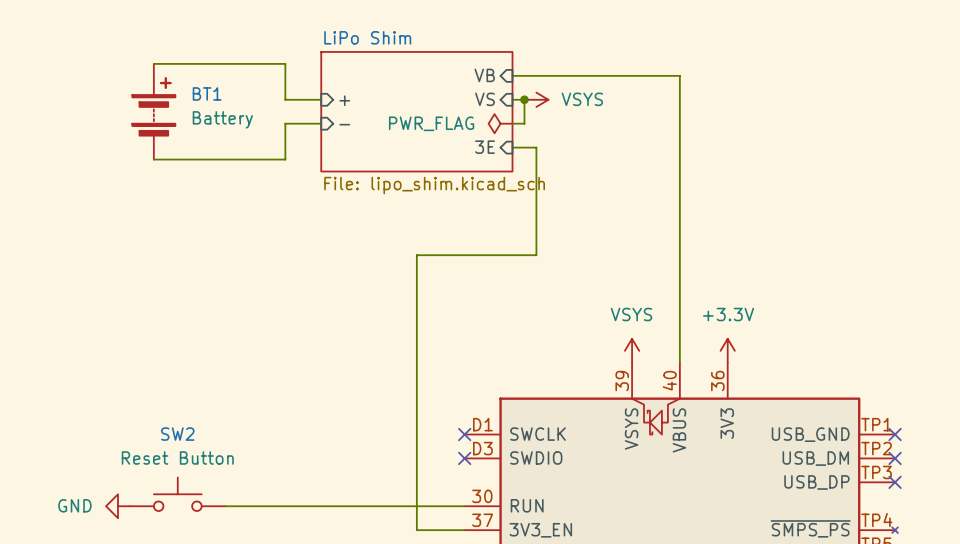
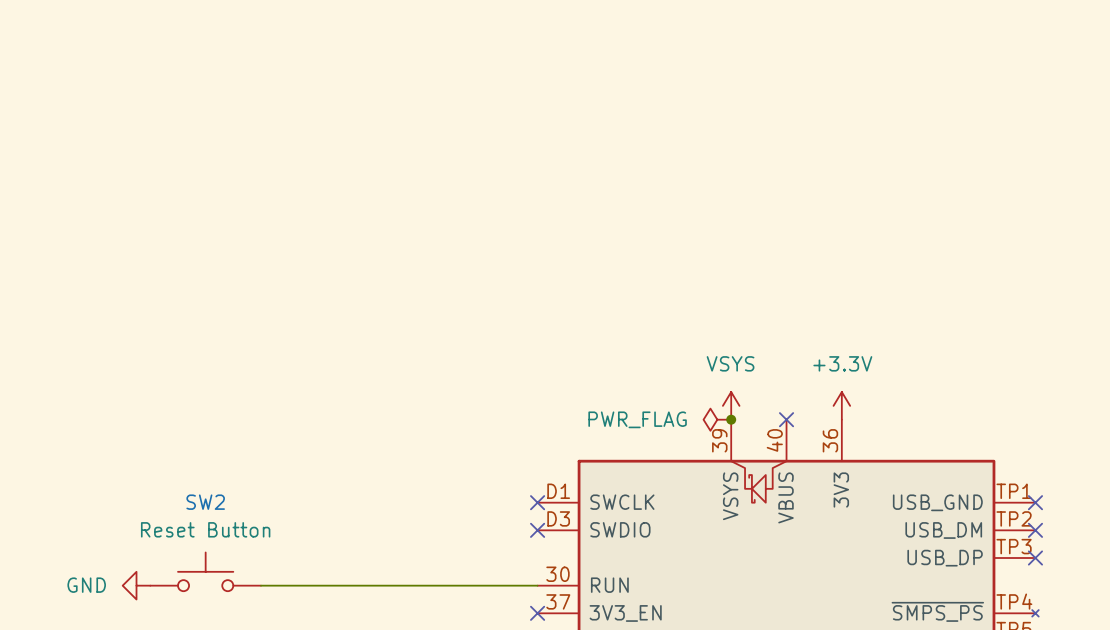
wire: (153, 63) (285, 63) (285, 99) (321, 99) -> none
sheet pin: VB (484, 75) -> none
wire: (512, 75) (679, 75) (679, 362) -> none
sheet pin: VS (484, 99) -> none
wire: (512, 99) (524, 99) (524, 123) (512, 123) -> none
junction: (524, 99) -> none
power symbol: VSYS (536, 99) -> none
sheet pin: + (344, 100) -> none
BT1: Battery (153, 111) -> none
sheet LiPo Shim: File: lipo_shim.kicad_sch (416, 111) -> none
wire: (321, 123) (285, 123) (285, 159) (153, 159) -> none
power symbol: PWR_FLAG (500, 123) -> none
sheet pin: - (344, 124) -> none
sheet pin: 3E (484, 147) -> none
wire: (512, 147) (536, 147) (536, 255) (416, 255) (416, 530) (464, 530) -> none
power symbol: none -> PWR_FLAG (717, 419)
junction: none -> (731, 419)
no-connect mark: none -> (786, 419)
no-connect mark: none -> (537, 613)

